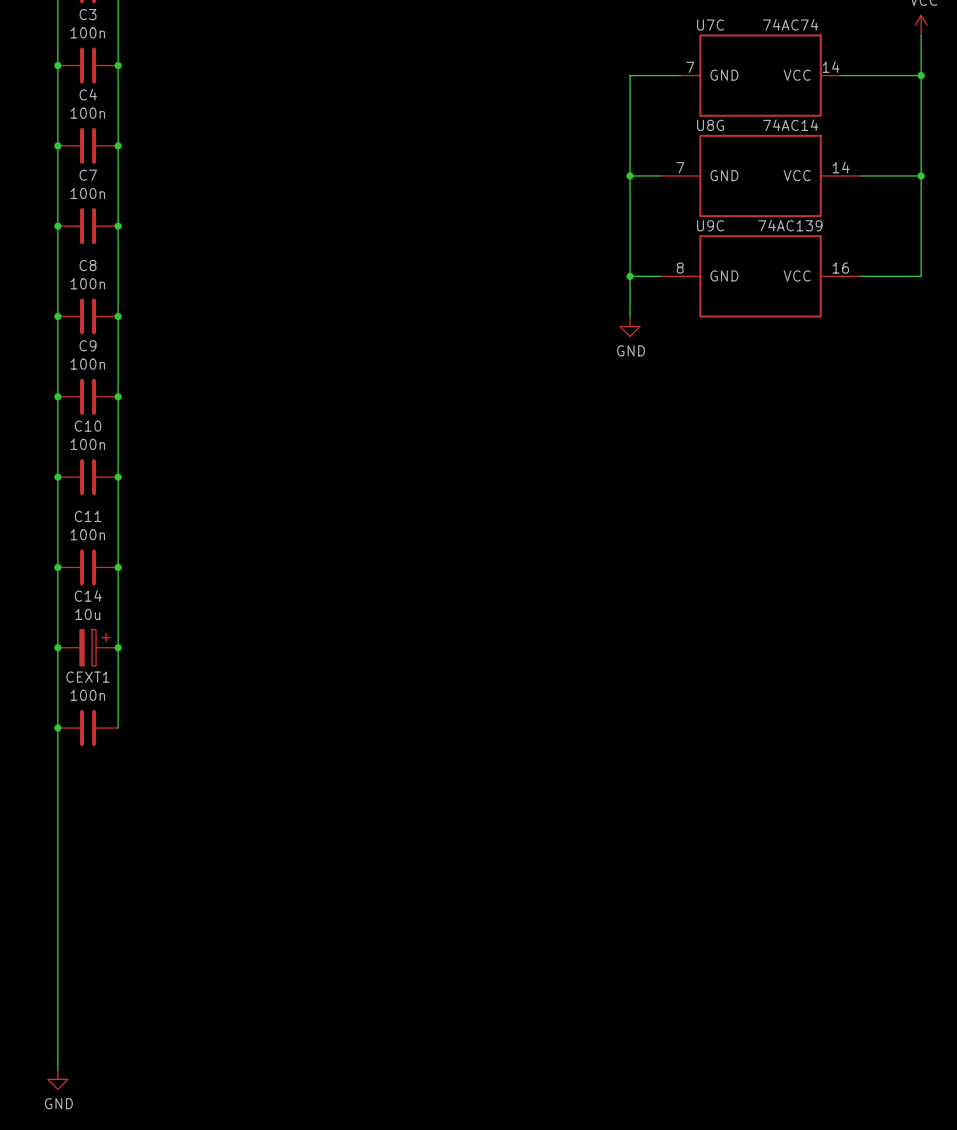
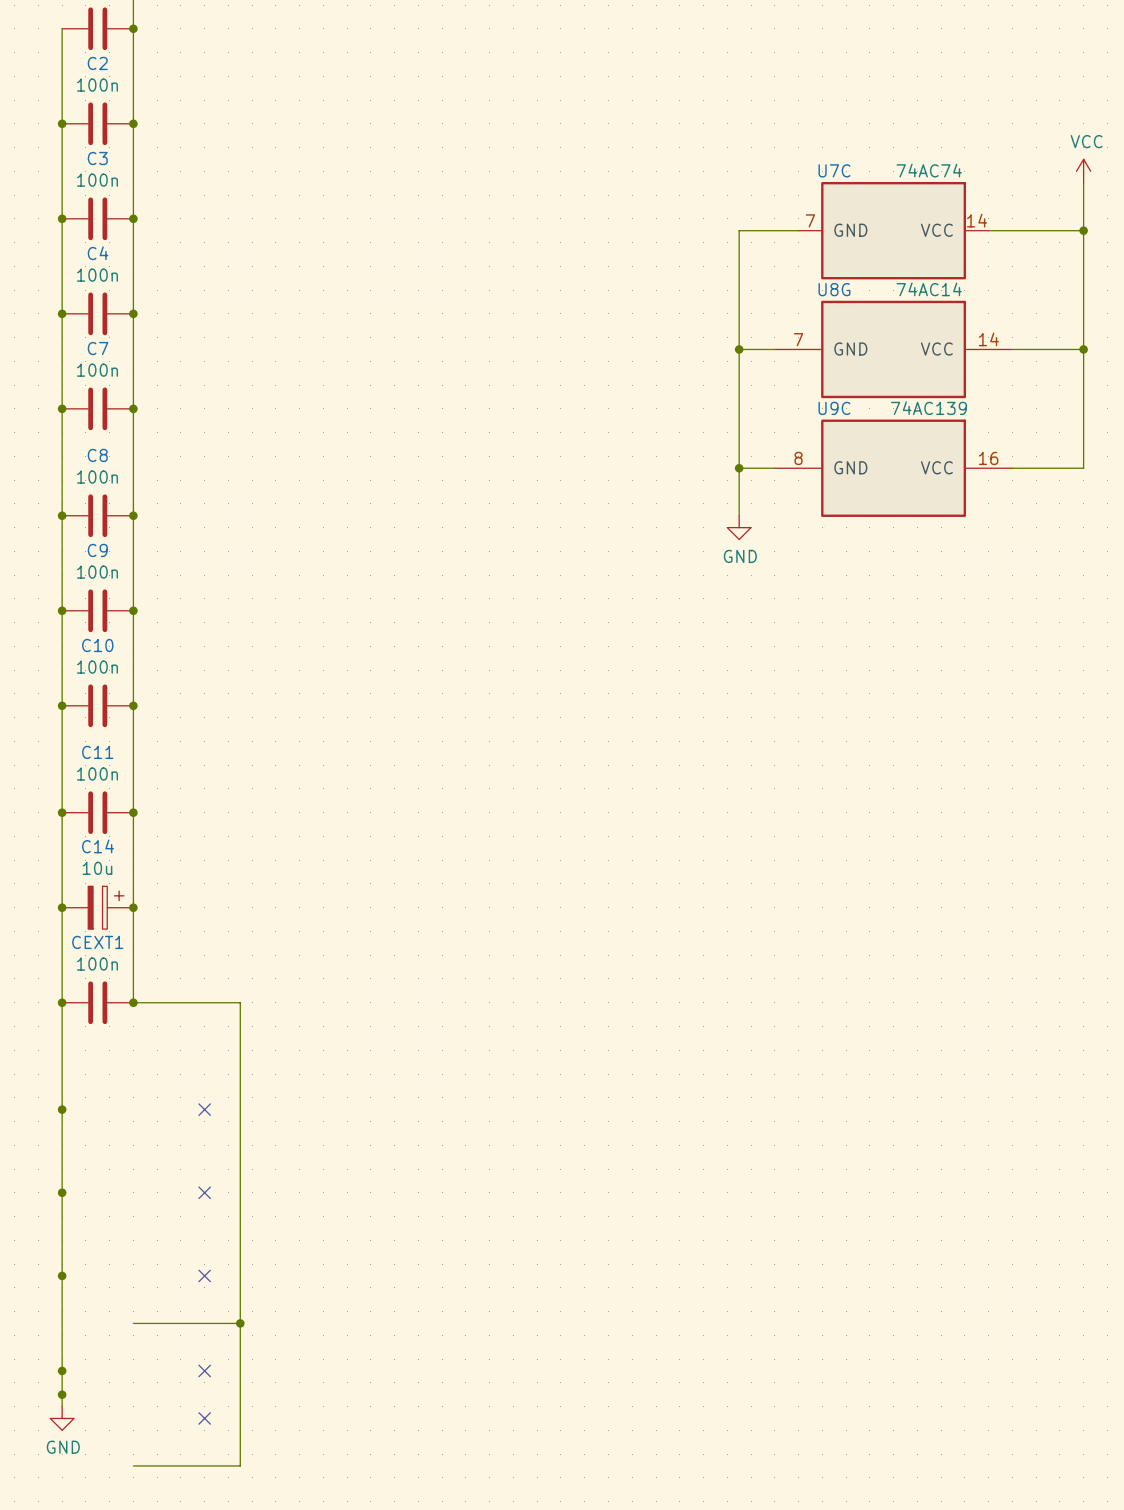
wire: none -> (133, 1002) (240, 1002) (240, 1465) (133, 1465)
junction: none -> (133, 1002)
junction: none -> (62, 1109)
no-connect mark: none -> (204, 1109)
junction: none -> (62, 1192)
no-connect mark: none -> (204, 1192)
junction: none -> (62, 1275)
no-connect mark: none -> (204, 1275)
wire: none -> (133, 1323) (240, 1323)
junction: none -> (240, 1323)
junction: none -> (62, 1370)
no-connect mark: none -> (204, 1370)
junction: none -> (62, 1394)
no-connect mark: none -> (204, 1418)

